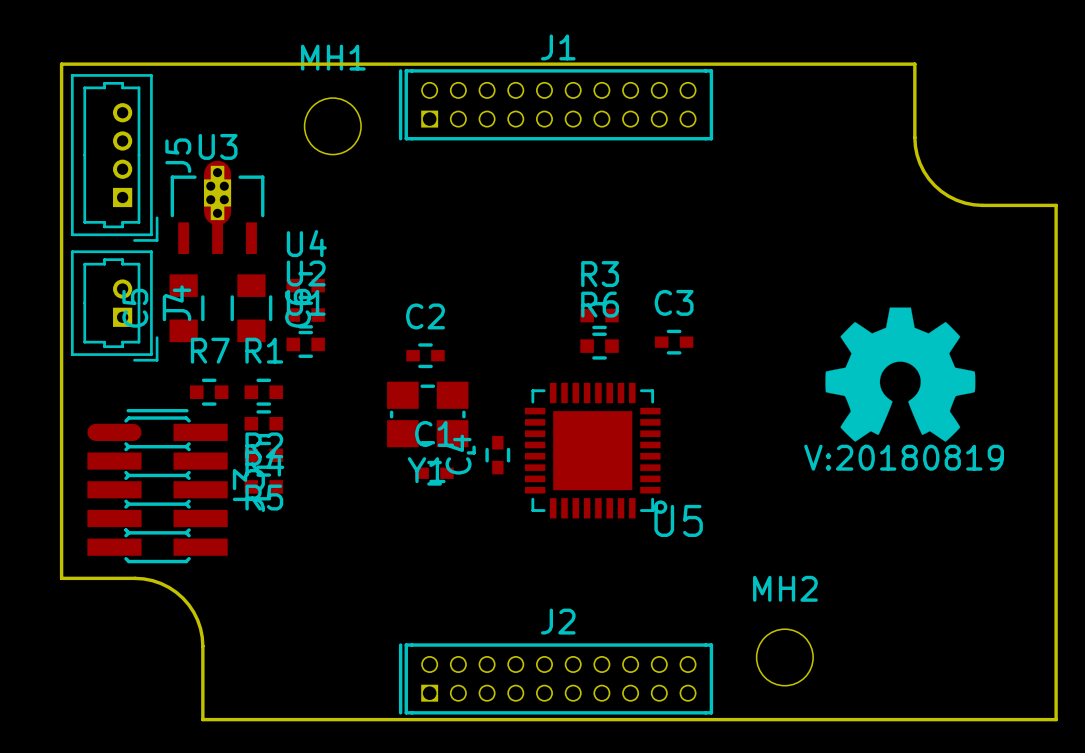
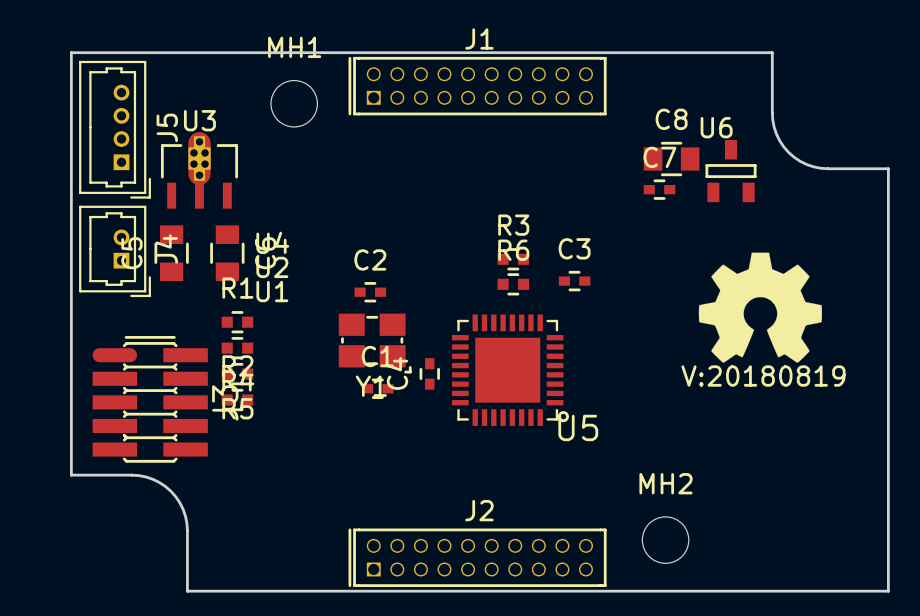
C8: none -> (671, 159)
U6: none -> (731, 171)
C7: none -> (659, 189)
U4 footprint: [286, 272, 325, 300] -> [256, 231, 290, 254]
U2 footprint: [286, 301, 325, 329] -> [256, 256, 289, 279]
U1 footprint: [286, 330, 325, 358] -> [256, 280, 289, 303]
R7: (209, 392) -> none

